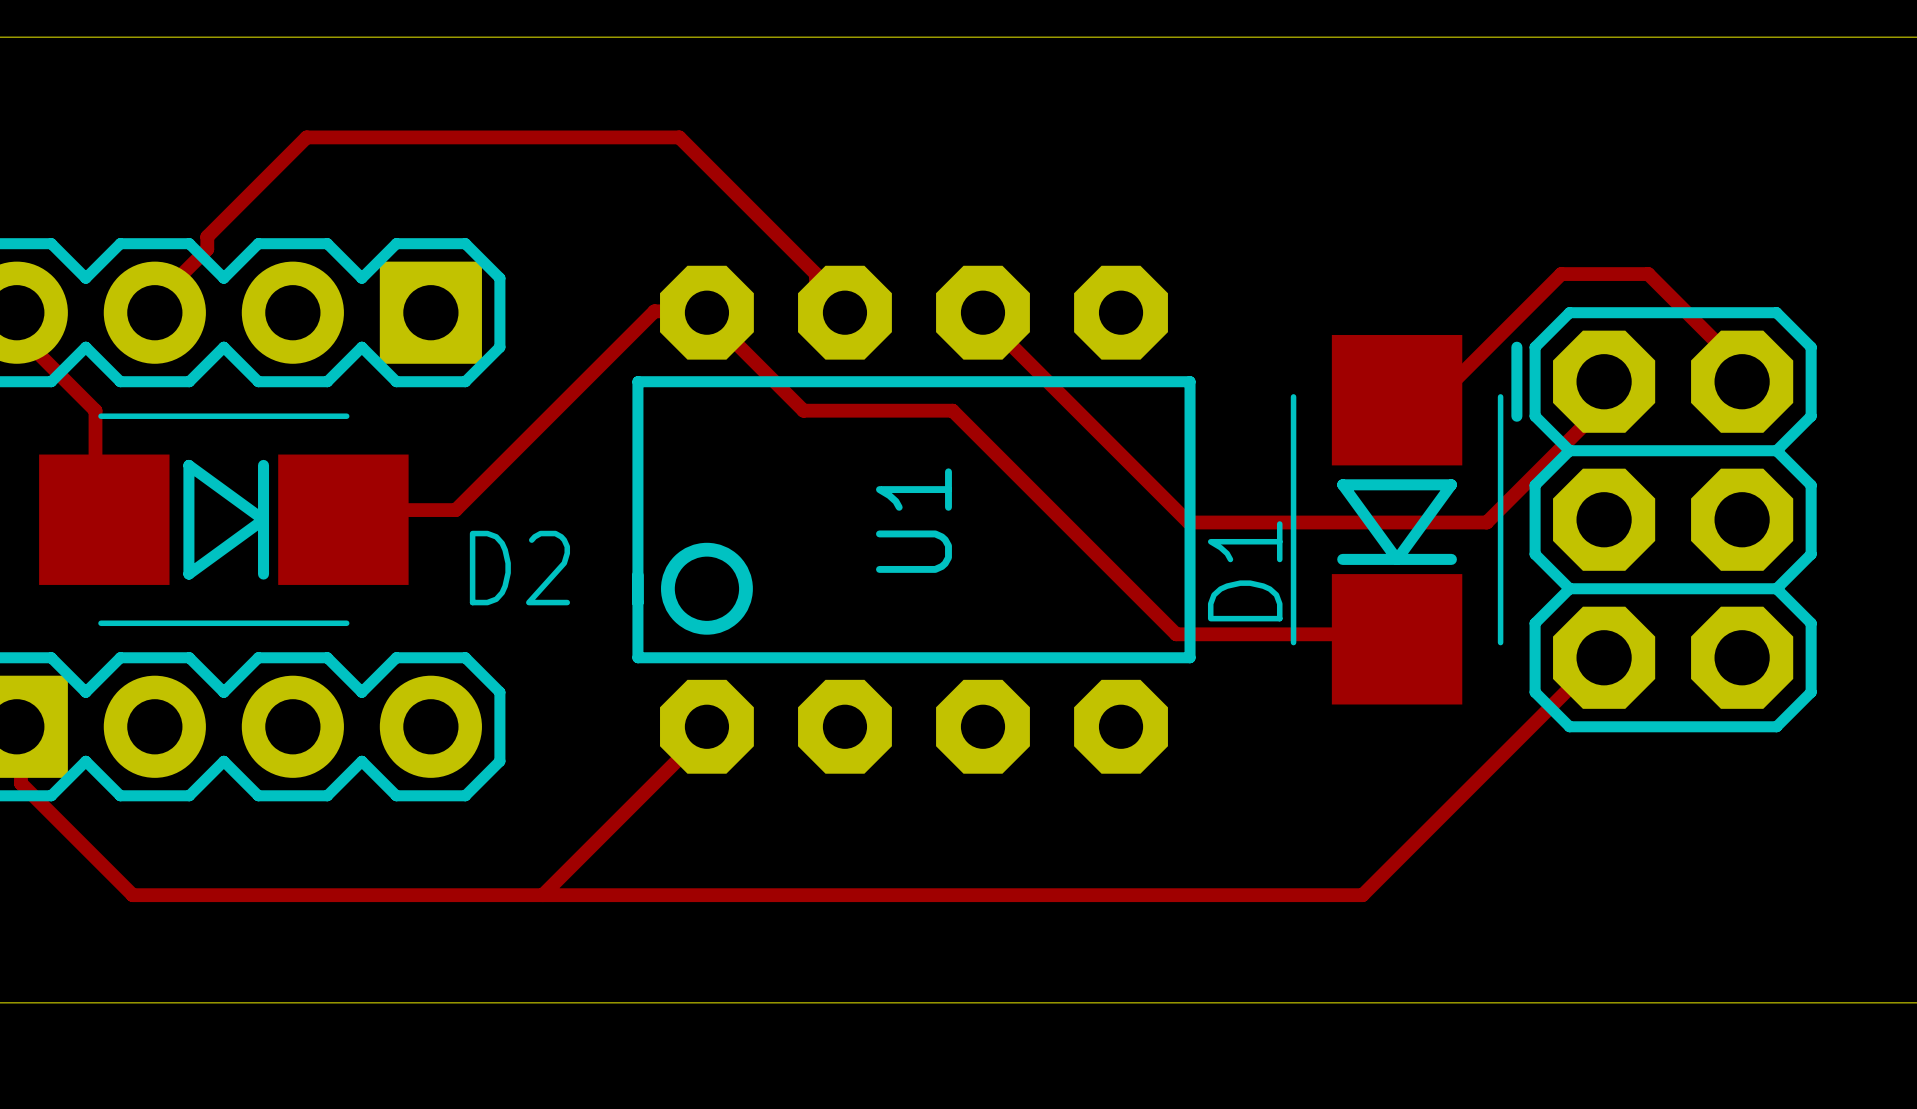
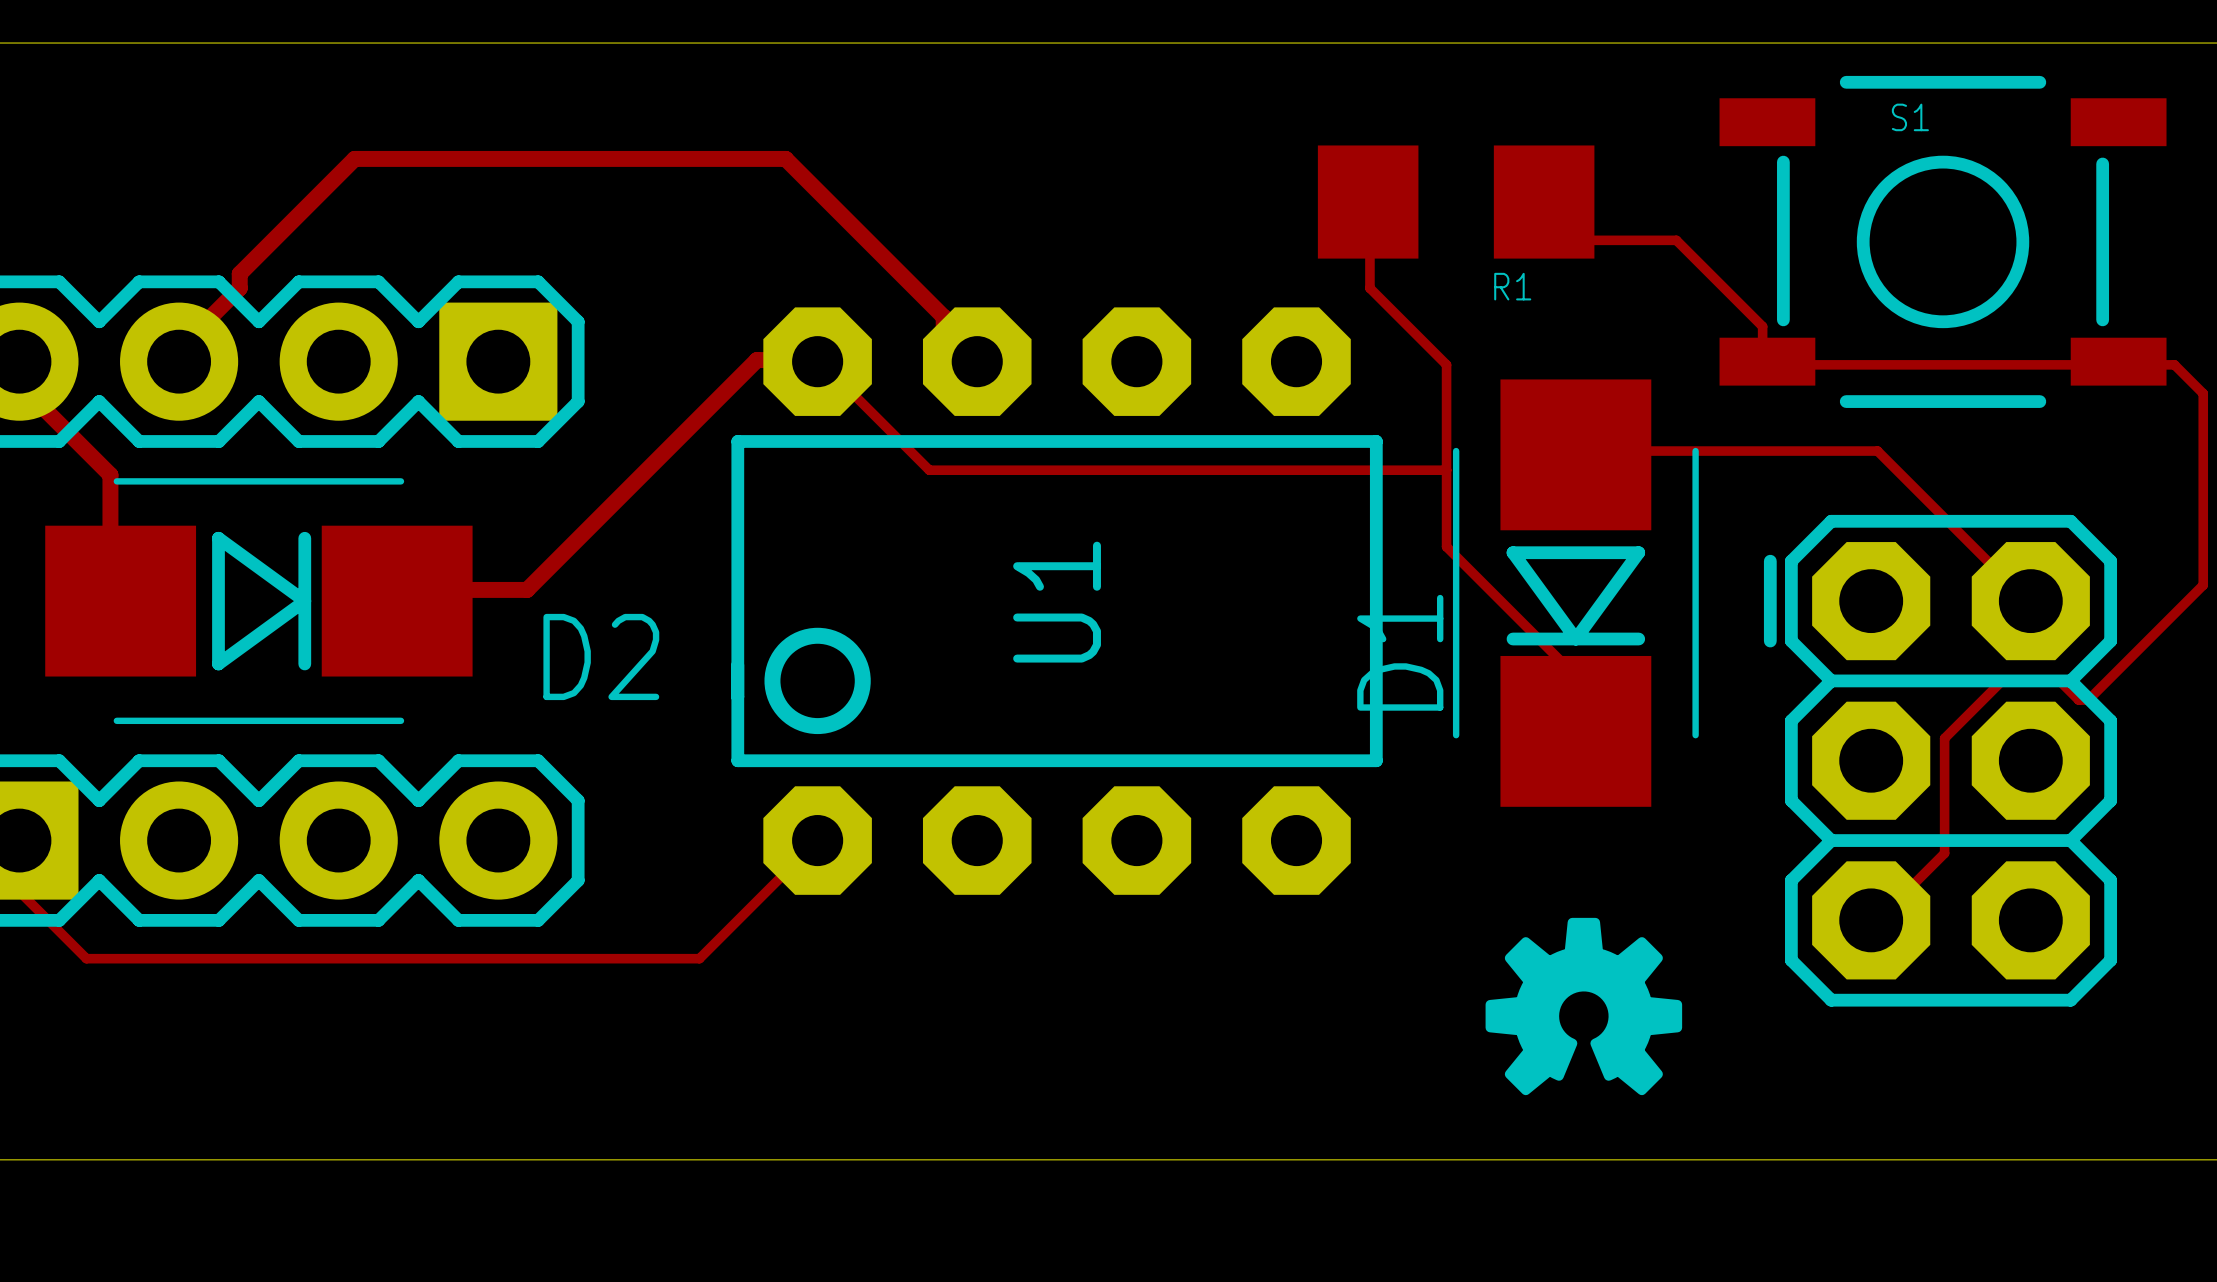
track: none -> (1368, 202) (1369, 202) (1369, 288) (1446, 364) (1446, 546) (1571, 671) (1571, 728) (1575, 731)
R1: none -> (1456, 202)
track: none -> (1544, 202) (1551, 202) (1590, 240) (1676, 240) (1762, 326) (1762, 355) (1772, 364) (2117, 364) (2118, 361) (2126, 364) (2174, 364) (2203, 393) (2203, 585) (2088, 700) (2078, 700) (2059, 680) (2002, 680) (1944, 738) (1944, 853) (1877, 920) (1871, 920)
S1: none -> (1943, 241)
track: (706, 312) (803, 410) (952, 410) (1176, 634) (1387, 634) (1397, 639) -> (817, 361) (824, 364) (929, 470) (1446, 470)
track: (982, 312) (989, 323) (1188, 522) (1486, 522) (1598, 410) (1598, 385) (1604, 381) -> none
track: (1742, 381) (1747, 373) (1648, 274) (1561, 274) (1437, 398) (1399, 398) (1397, 400) -> none
track: none -> (1575, 454) (1580, 451) (1877, 451) (2030, 604) (2030, 601)
D1 position: (1397, 519) -> (1575, 593)
part position: (1664, 519) -> (1940, 760)
track: (1604, 657) (1598, 659) (1362, 895) (132, 895) (20, 783) (20, 733) (16, 726) -> none
track: (706, 726) (704, 733) (542, 895) -> (817, 840) (699, 958) (86, 958) (19, 891) (19, 840)
drawing: none -> [1485, 917, 1683, 1096]

